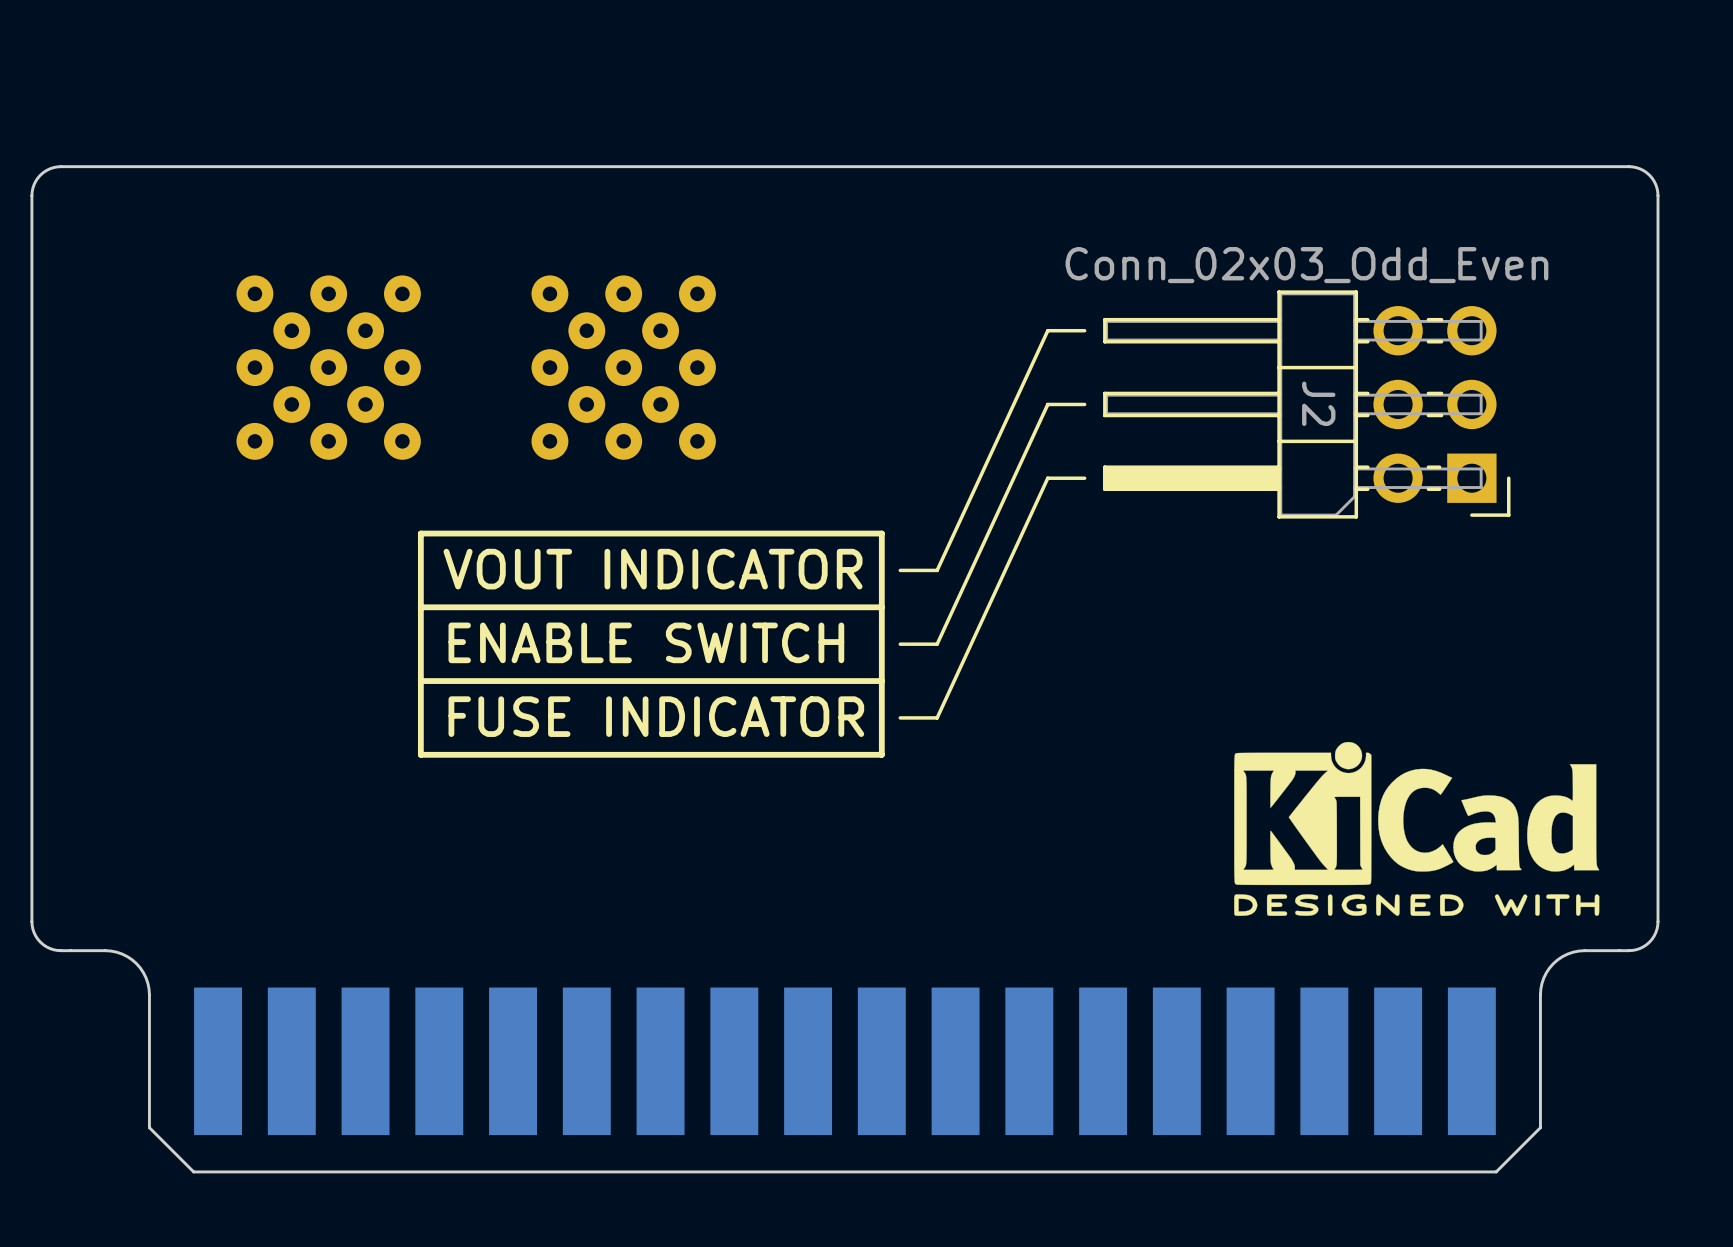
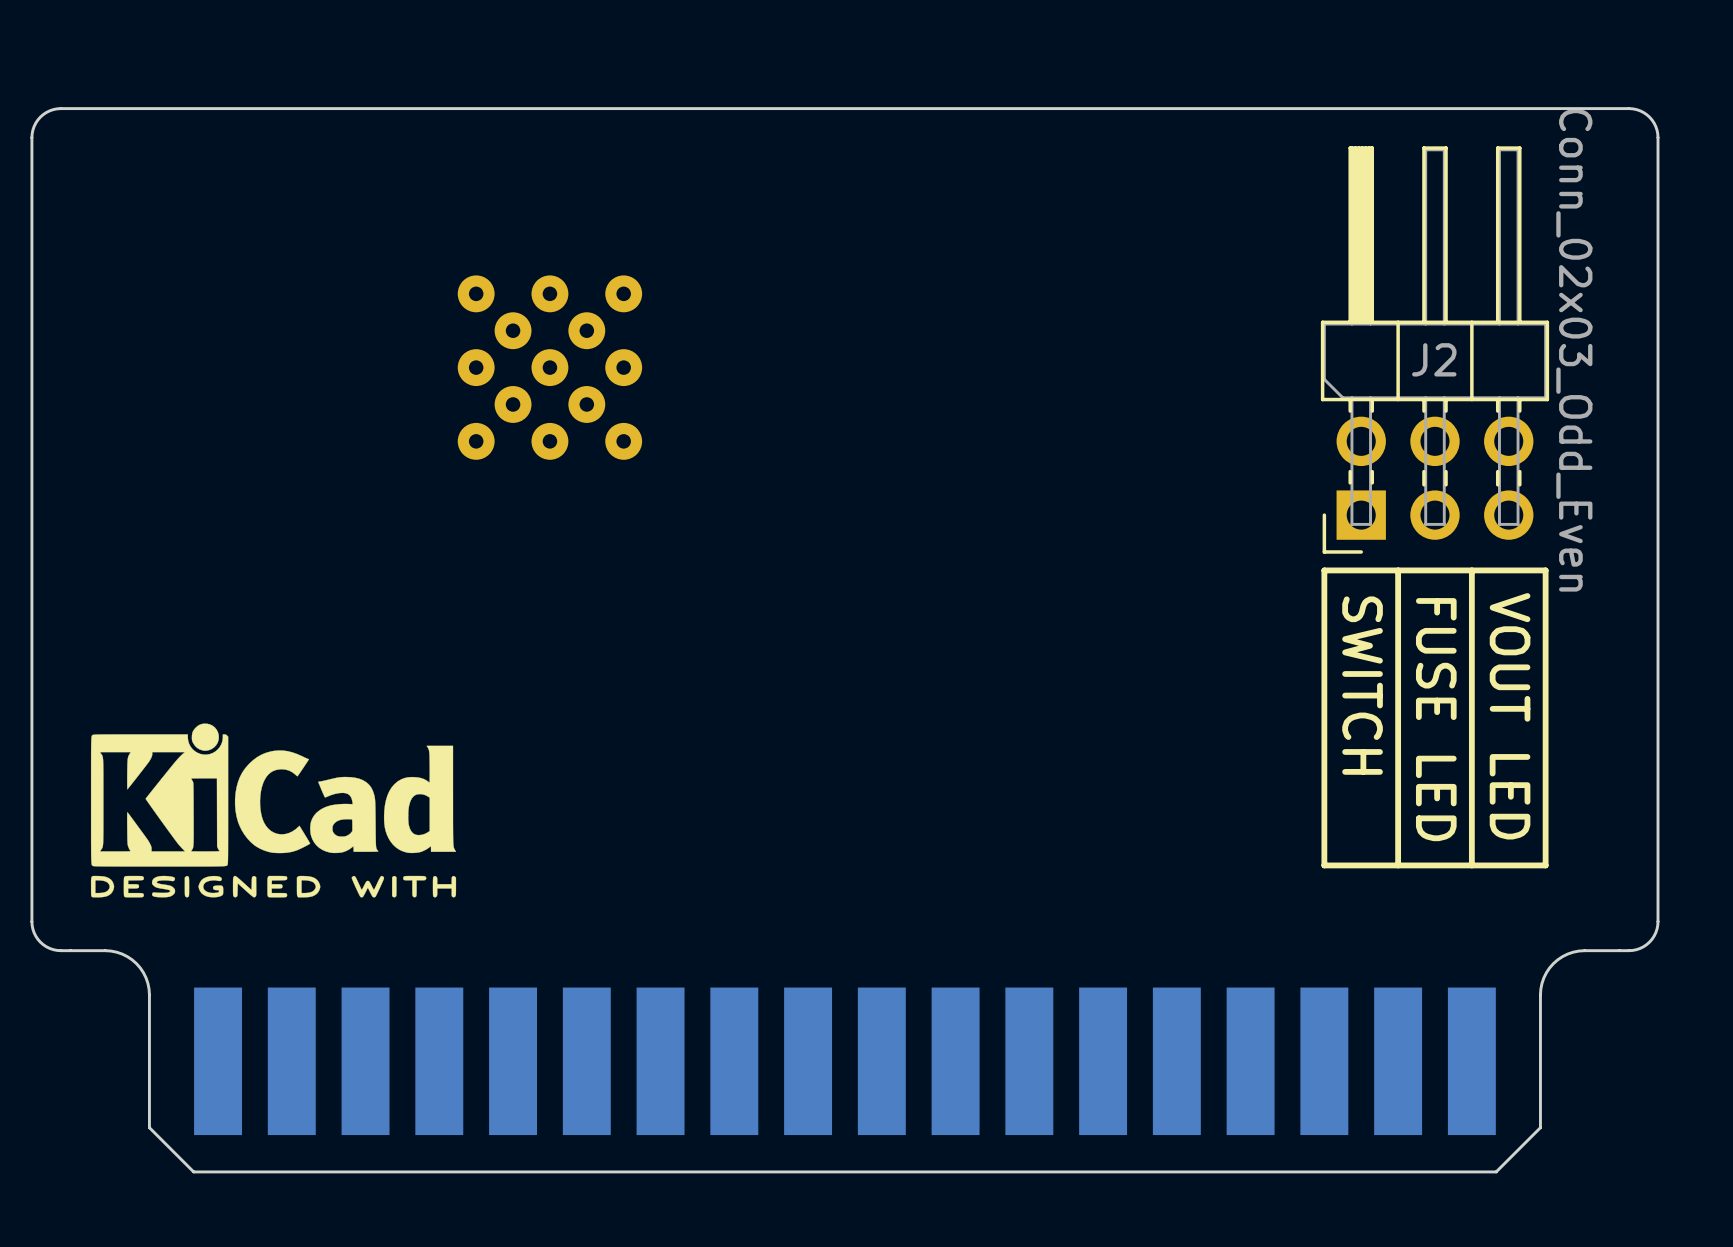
board edge: (1658, 195) (1655, 184) (1649, 175) (1640, 168) (1628, 166) (60, 166) (49, 168) (40, 175) (34, 184) (31, 195) -> (1658, 195) (1657, 130) (1646, 114) (1628, 108) (60, 108) (43, 114) (32, 130) (31, 195)
line: (1084, 330) (1047, 330) (937, 570) (900, 570) -> none
part: (328, 367) -> none
part position: (623, 367) -> (549, 367)
line: (1084, 404) (1047, 404) (937, 644) (900, 644) -> none
J2 rotation: 0° (1306, 404) -> 90° clockwise (1434, 350)
line: (1084, 478) (1047, 478) (937, 717) (900, 717) -> none
line: (881, 533) (420, 533) (420, 754) (881, 754) (881, 533) -> none
text: VOUT INDICATOR (653, 569) -> none
line: none -> (1398, 570) (1398, 865)
line: none -> (1471, 570) (1471, 865)
line: none -> (1545, 570) (1545, 865) (1324, 865) (1324, 570) (1545, 570)
line: (881, 607) (420, 607) -> none
text: ENABLE SWITCH (646, 642) -> none
line: (881, 681) (420, 681) -> none
text: none -> SWITCH (1362, 685)
text: FUSE INDICATOR (656, 716) -> none
text: none -> VOUT LED (1510, 716)
text: none -> FUSE LED (1436, 719)
drawing: none -> [90, 723, 457, 898]
drawing: [1234, 741, 1600, 916] -> none

